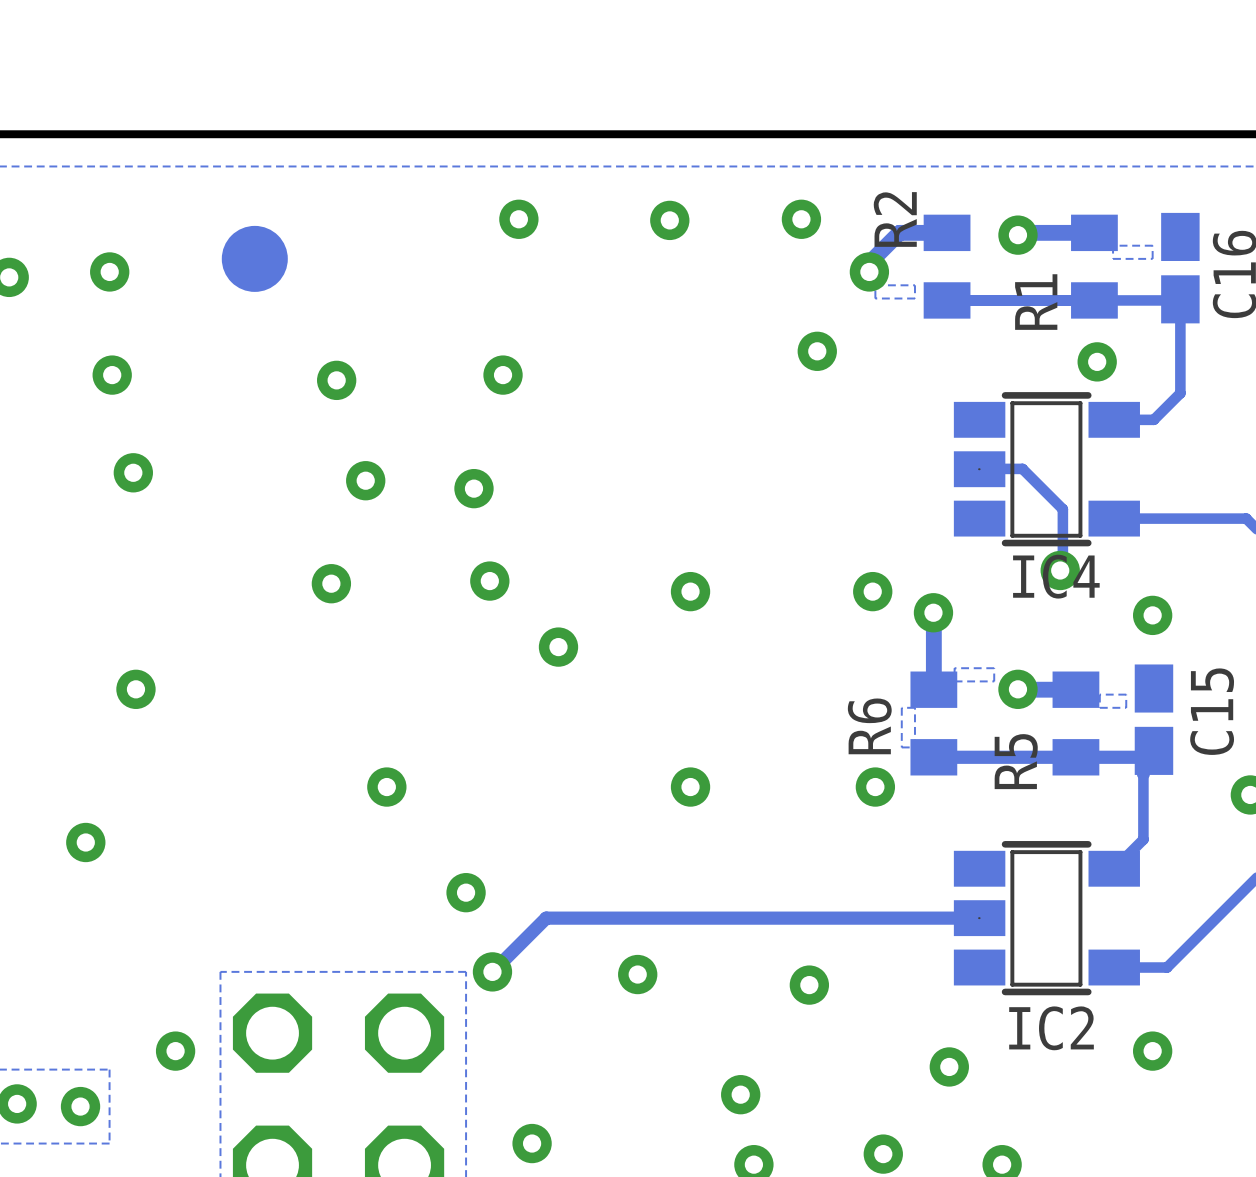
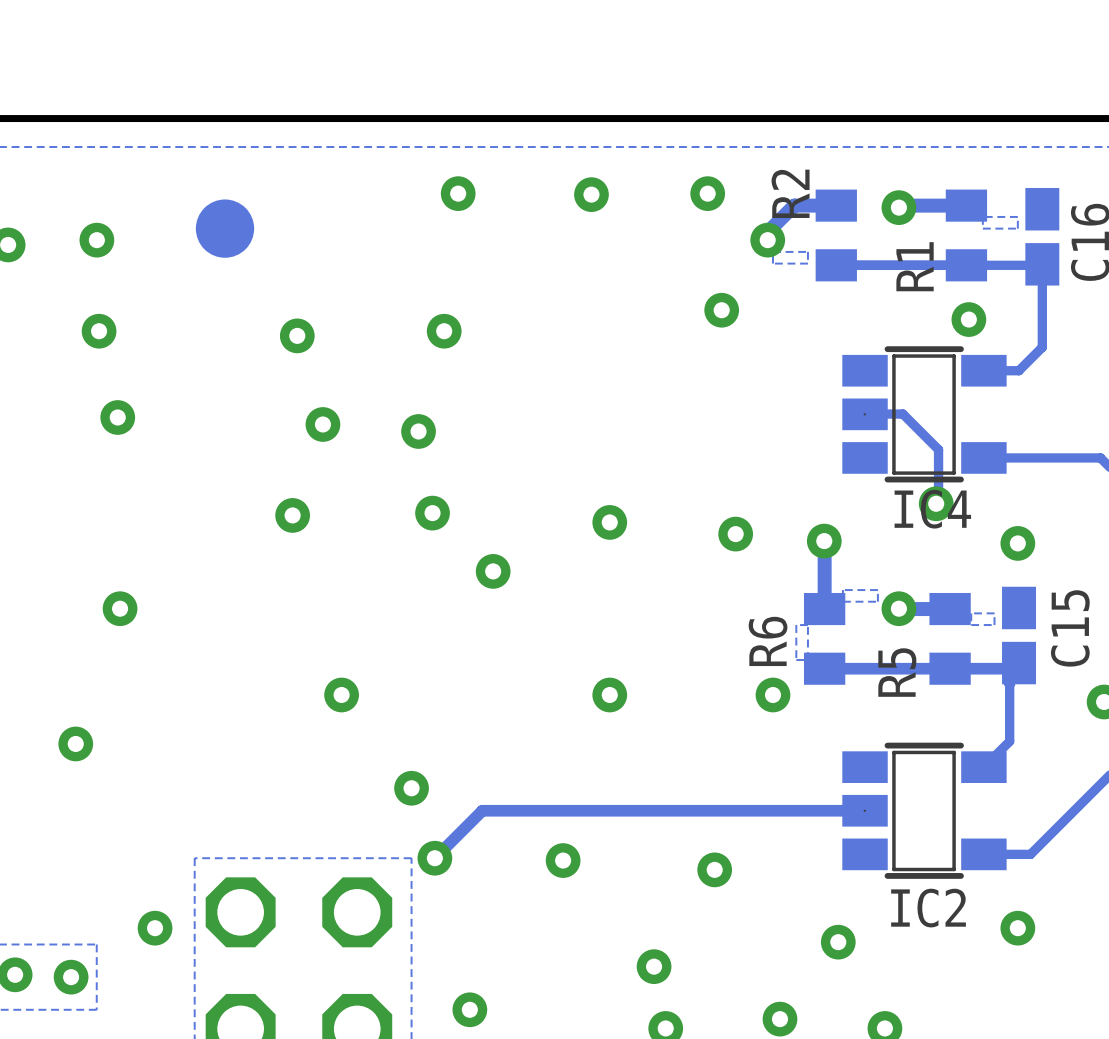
via position: (872, 591) -> (735, 534)

